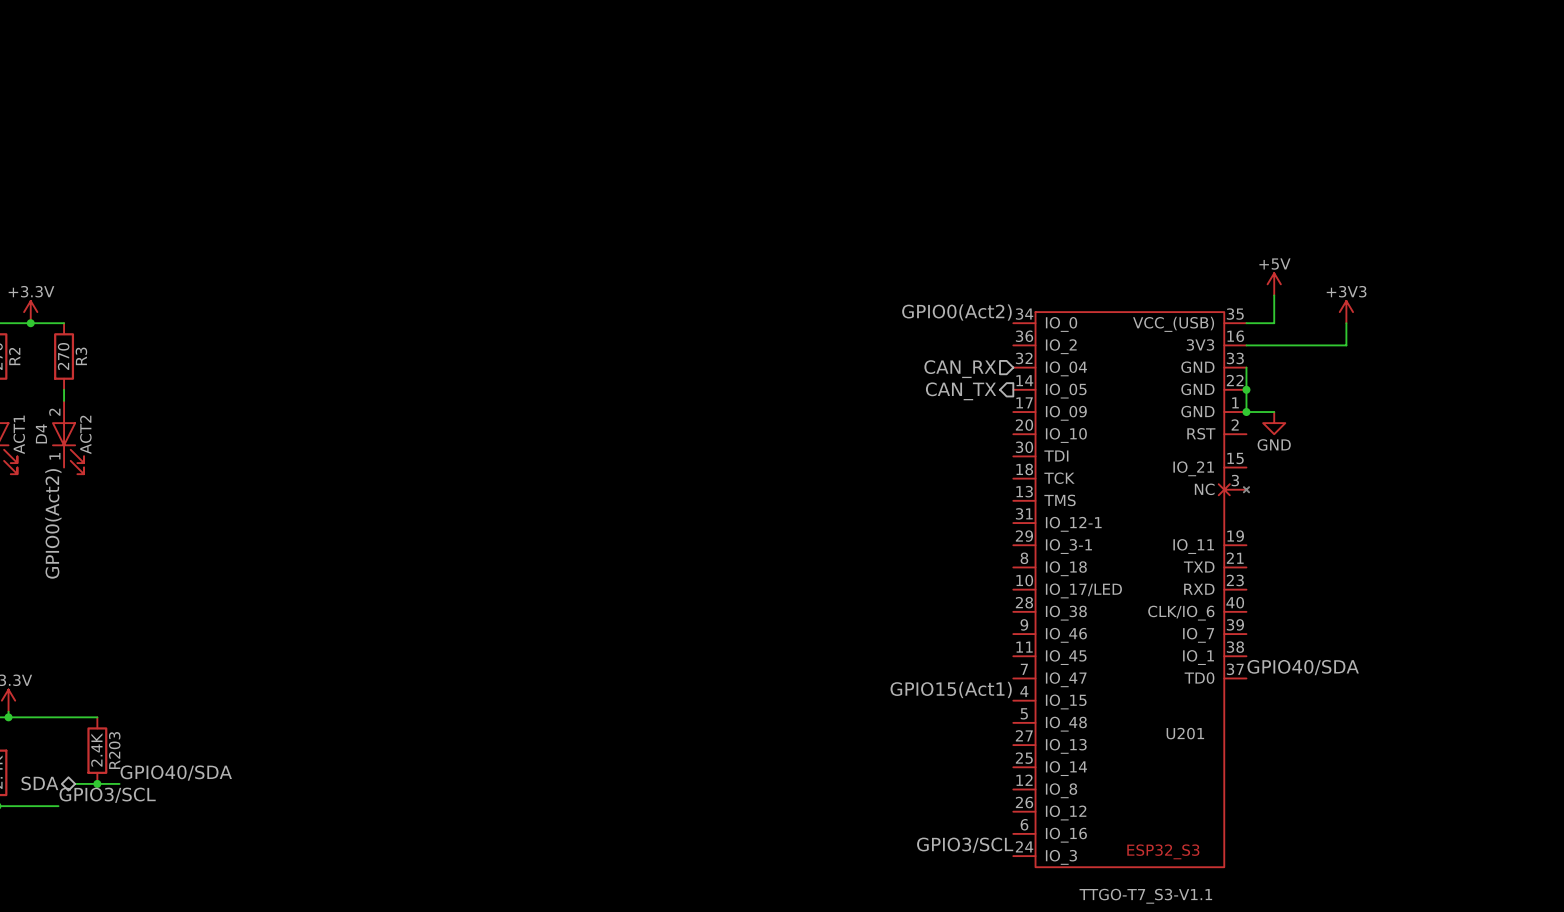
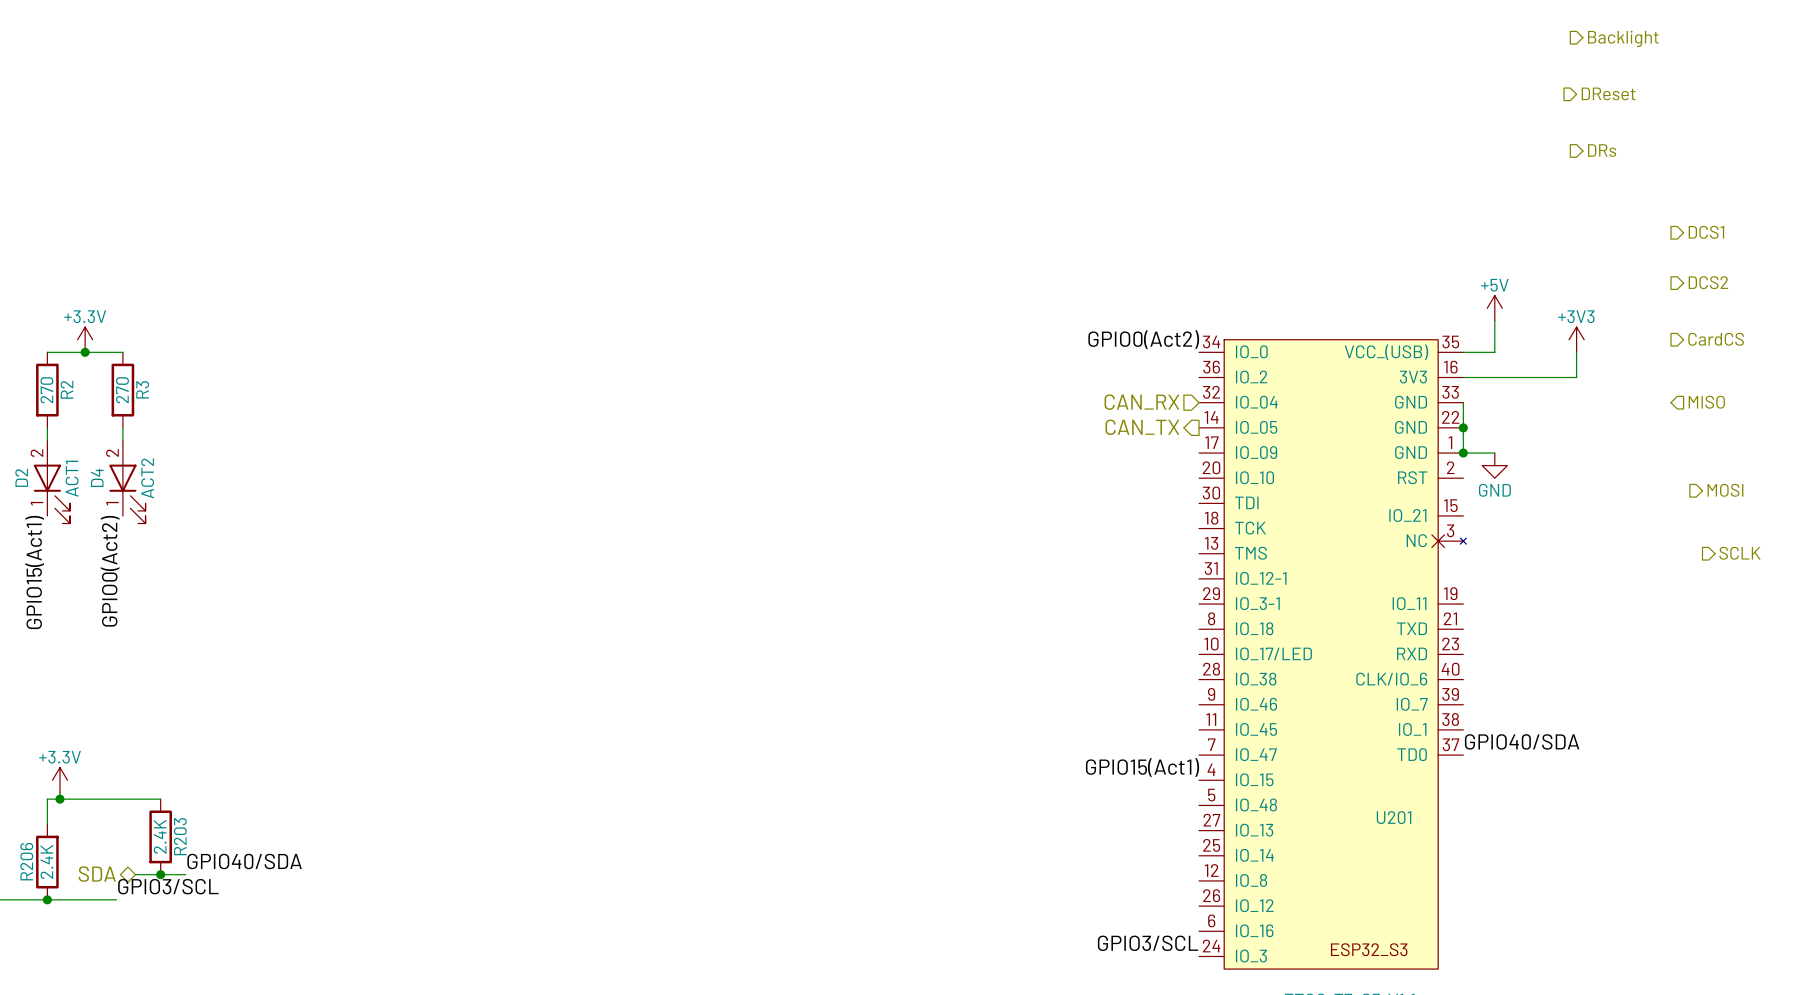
hierarchical label: none -> Backlight (1623, 38)
hierarchical label: none -> DReset (1608, 93)
hierarchical label: none -> DRs (1602, 150)
hierarchical label: none -> DCS1 (1706, 232)
hierarchical label: none -> DCS2 (1708, 282)
hierarchical label: none -> CardCS (1716, 339)
hierarchical label: none -> MISO (1706, 402)
hierarchical label: none -> MOSI (1725, 490)
hierarchical label: none -> SCLK (1739, 553)

